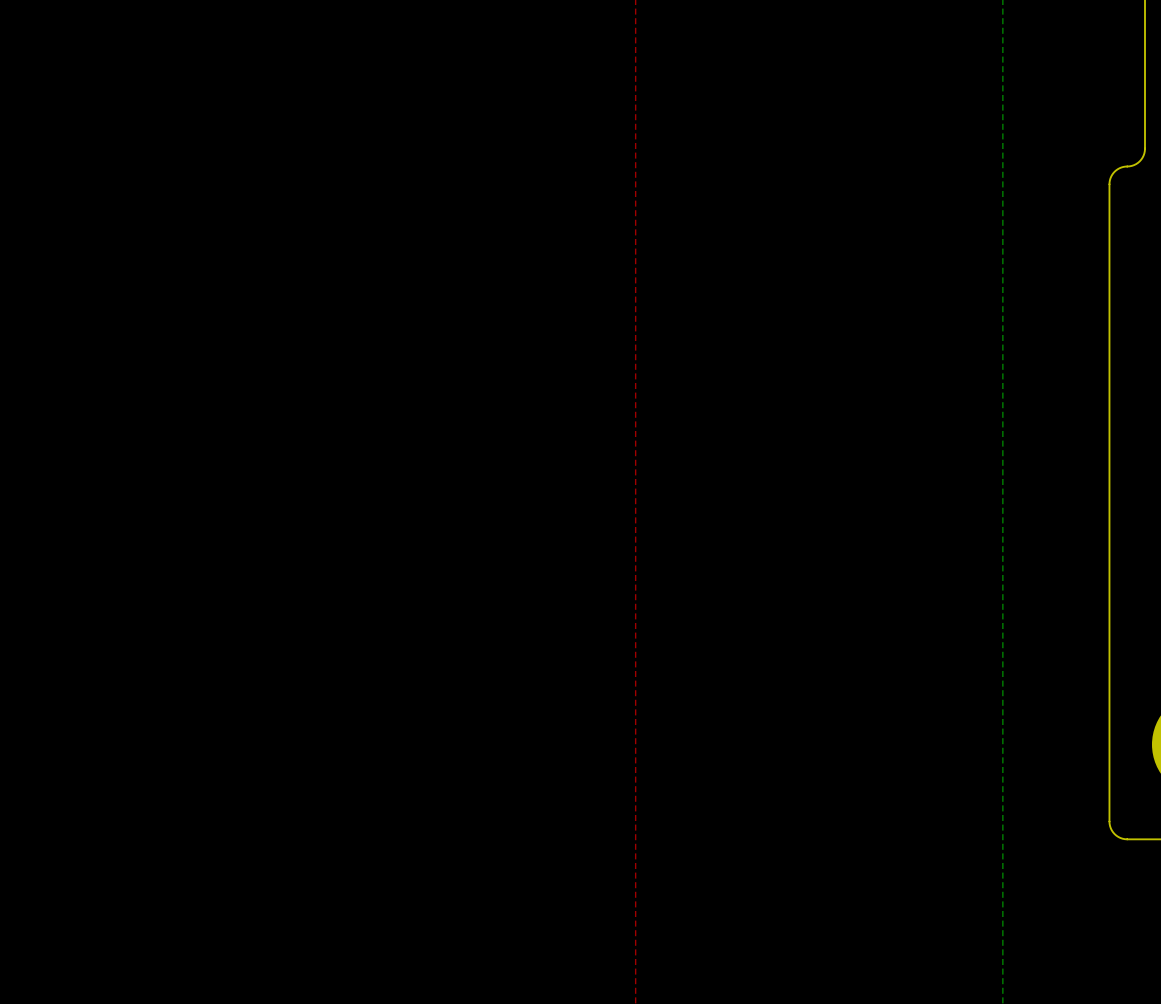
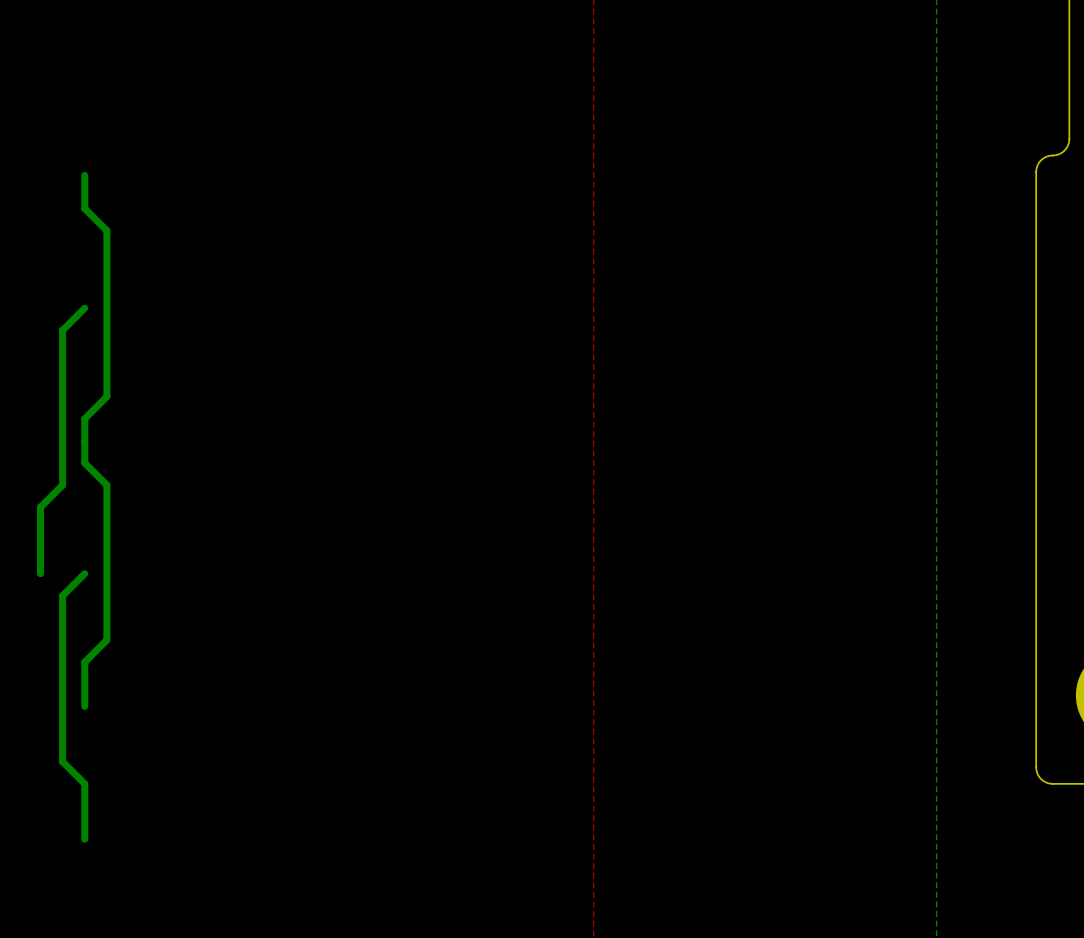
bottom track: none -> (84, 175) (84, 208) (106, 230) (106, 396) (84, 418) (84, 463) (106, 485) (106, 640) (84, 662) (84, 706)
bottom track: none -> (84, 308) (62, 330) (62, 485) (40, 507) (40, 573)
bottom track: none -> (84, 573) (62, 595) (62, 761) (84, 783) (84, 839)

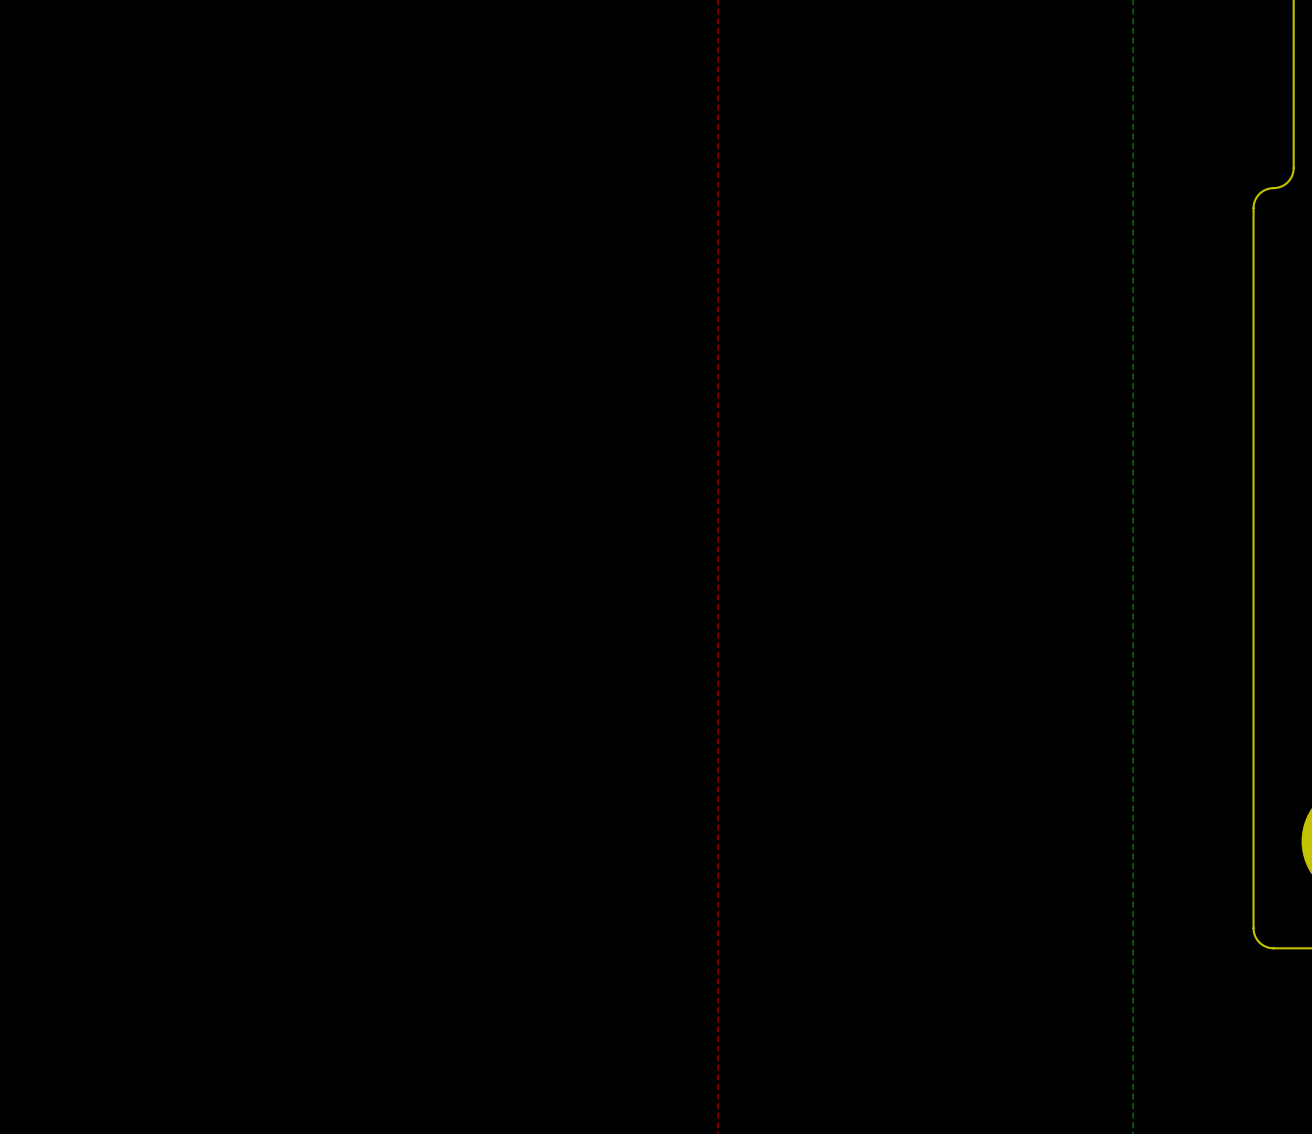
bottom track: (84, 175) (84, 208) (106, 230) (106, 396) (84, 418) (84, 463) (106, 485) (106, 640) (84, 662) (84, 706) -> none
bottom track: (84, 308) (62, 330) (62, 485) (40, 507) (40, 573) -> none
bottom track: (84, 573) (62, 595) (62, 761) (84, 783) (84, 839) -> none

